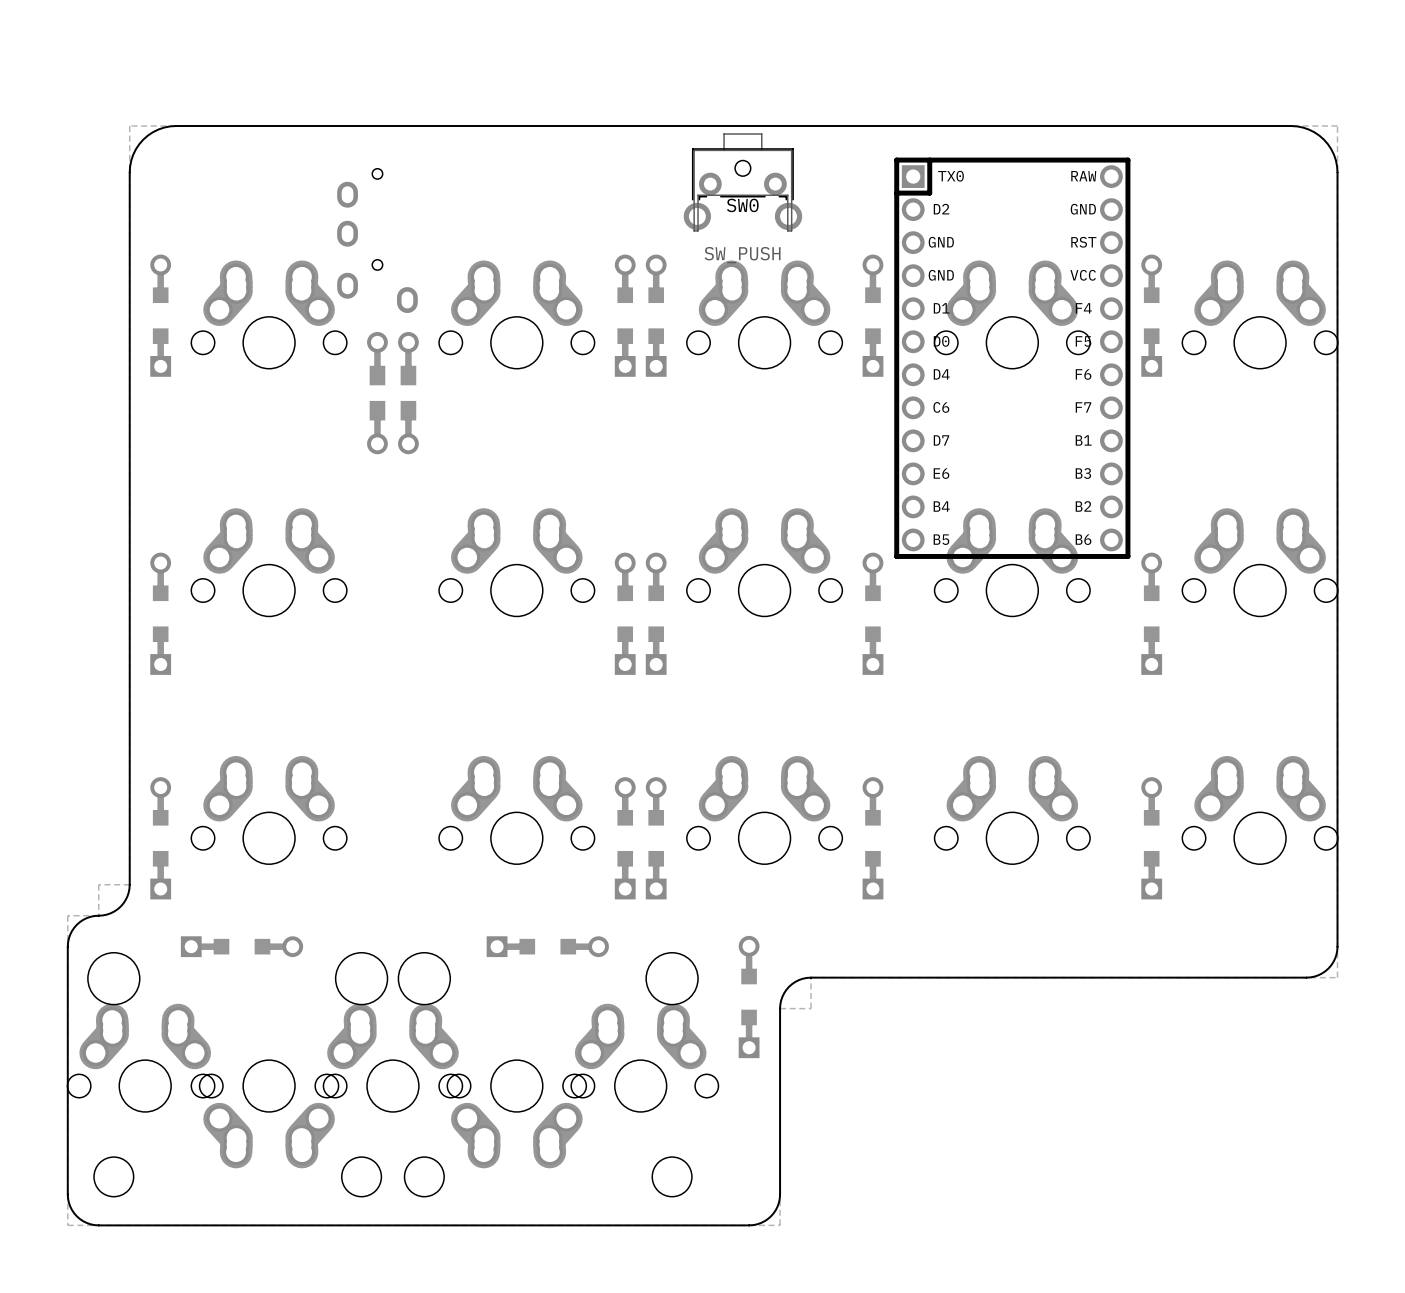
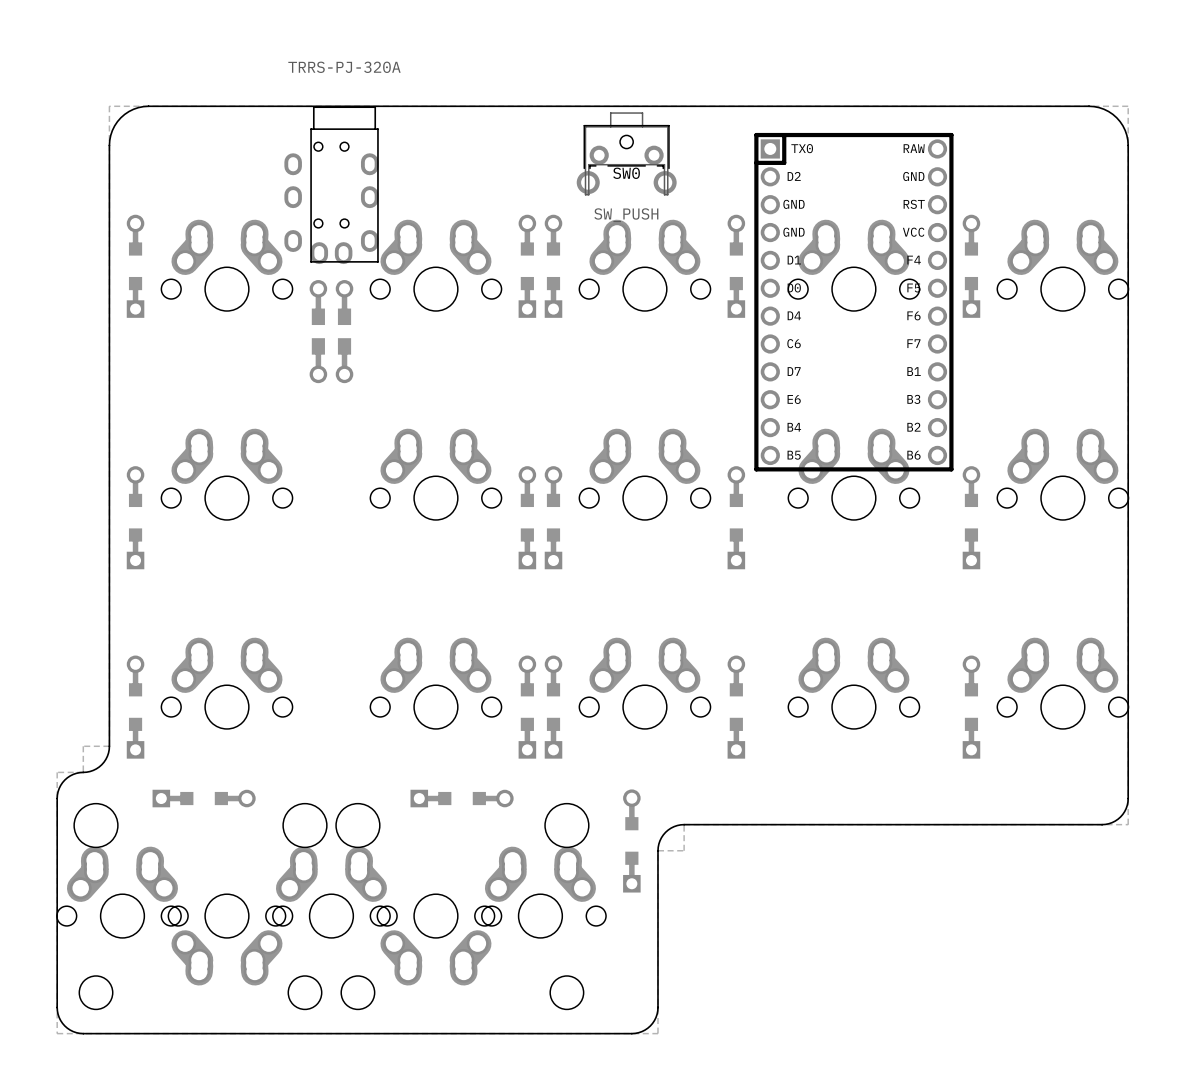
part: none -> TRRS-PJ-320A (344, 185)

